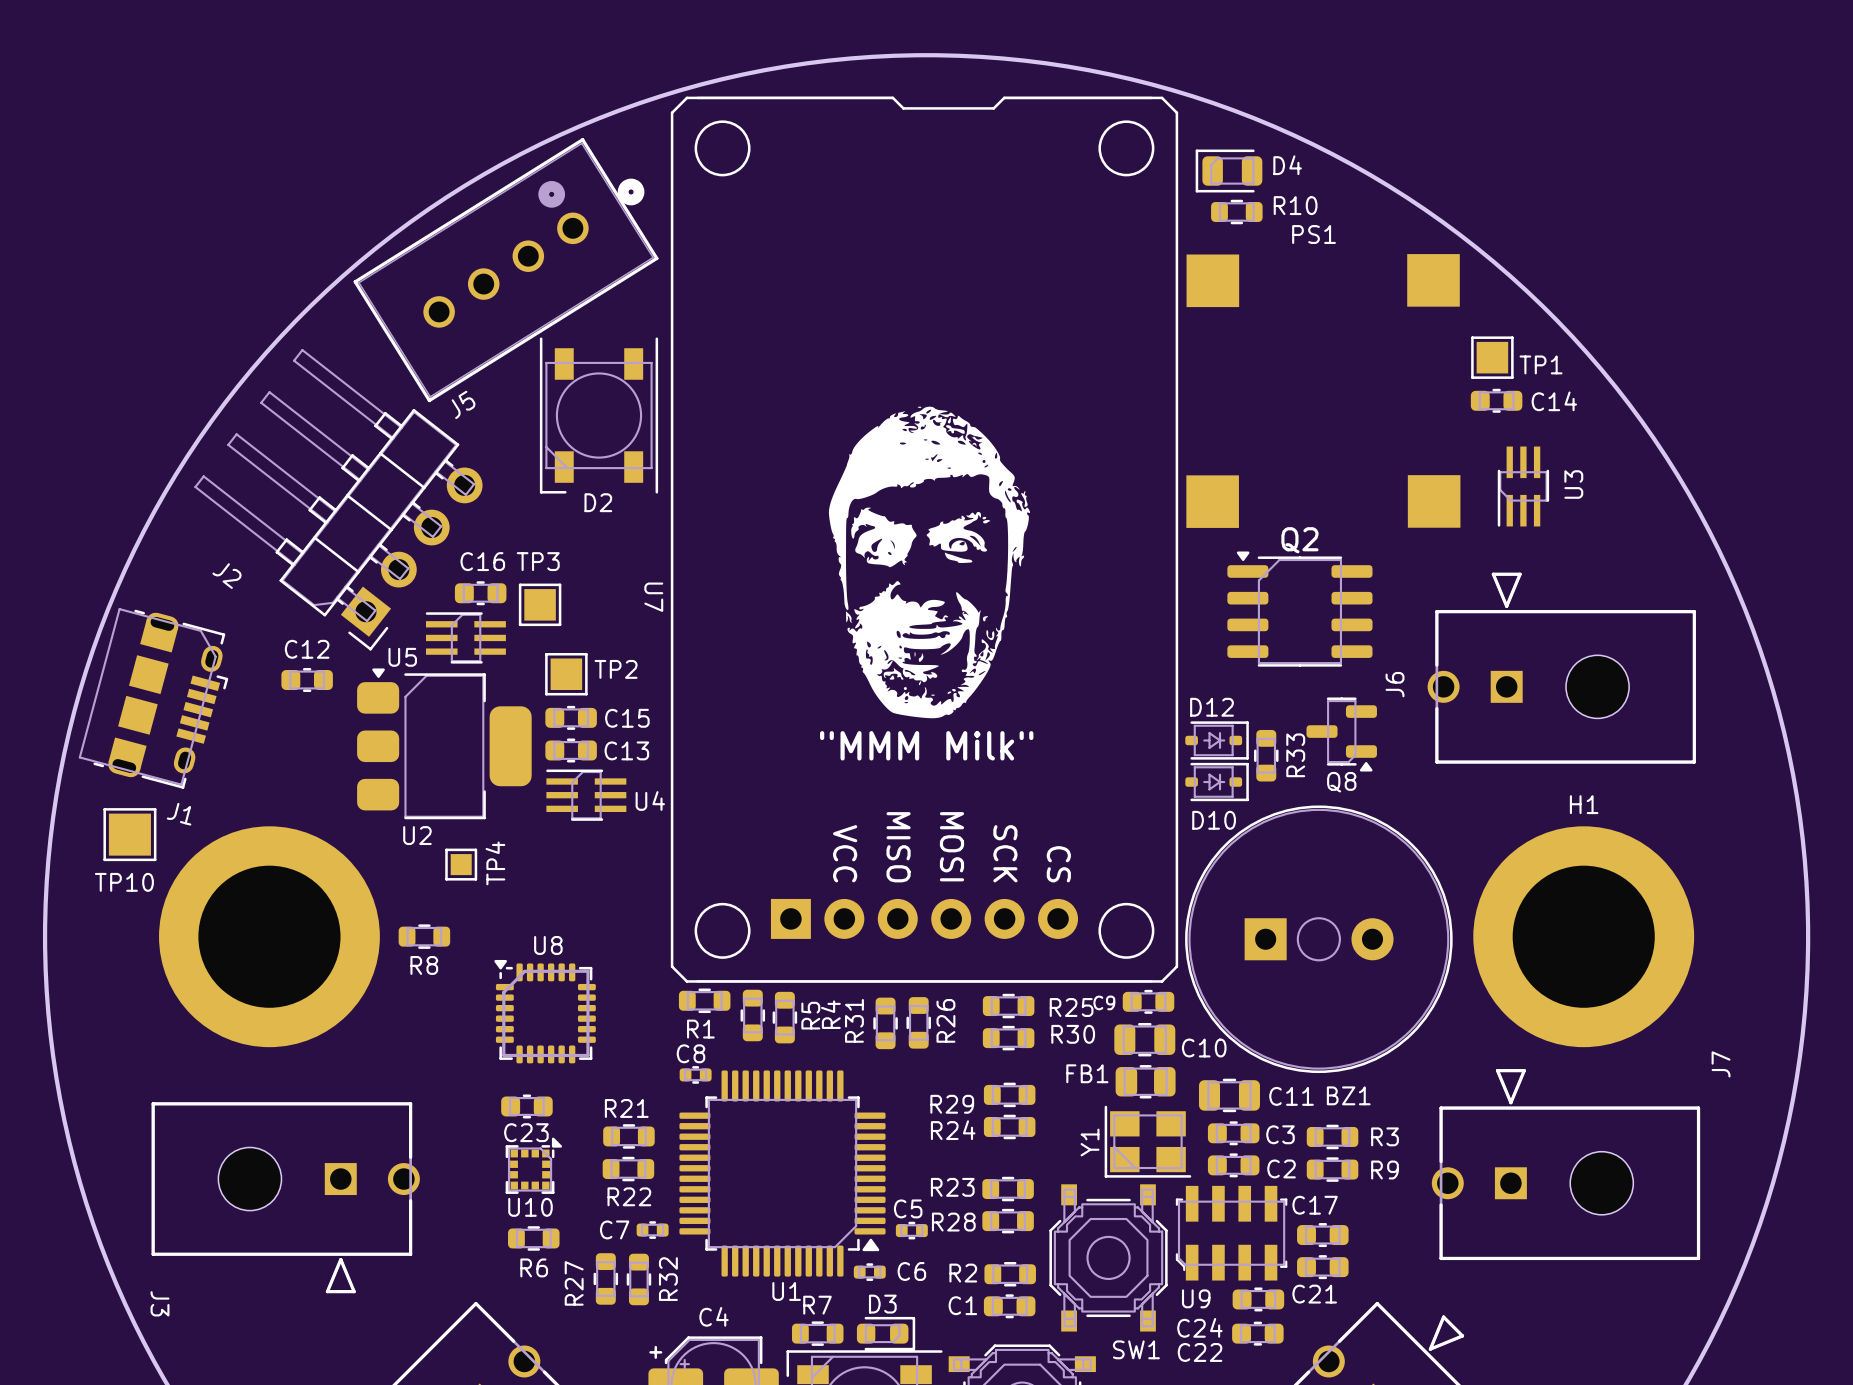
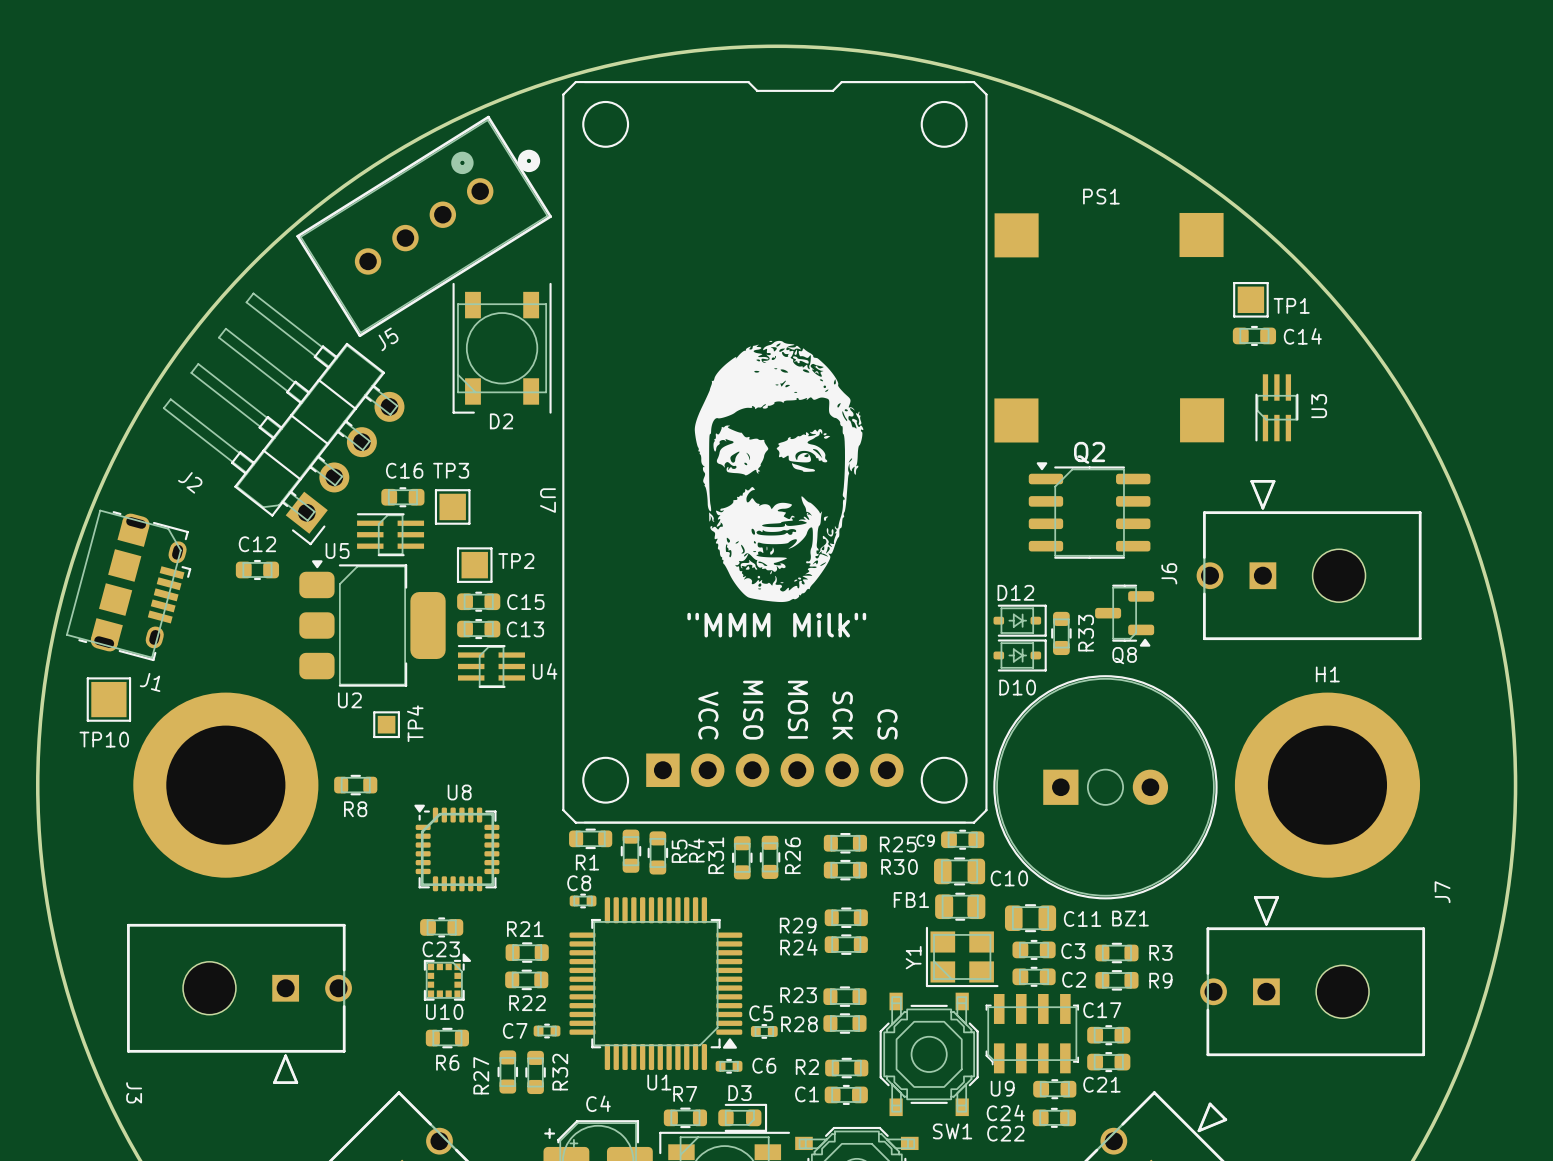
D4: (1229, 170) -> none
R10: (1236, 212) -> none

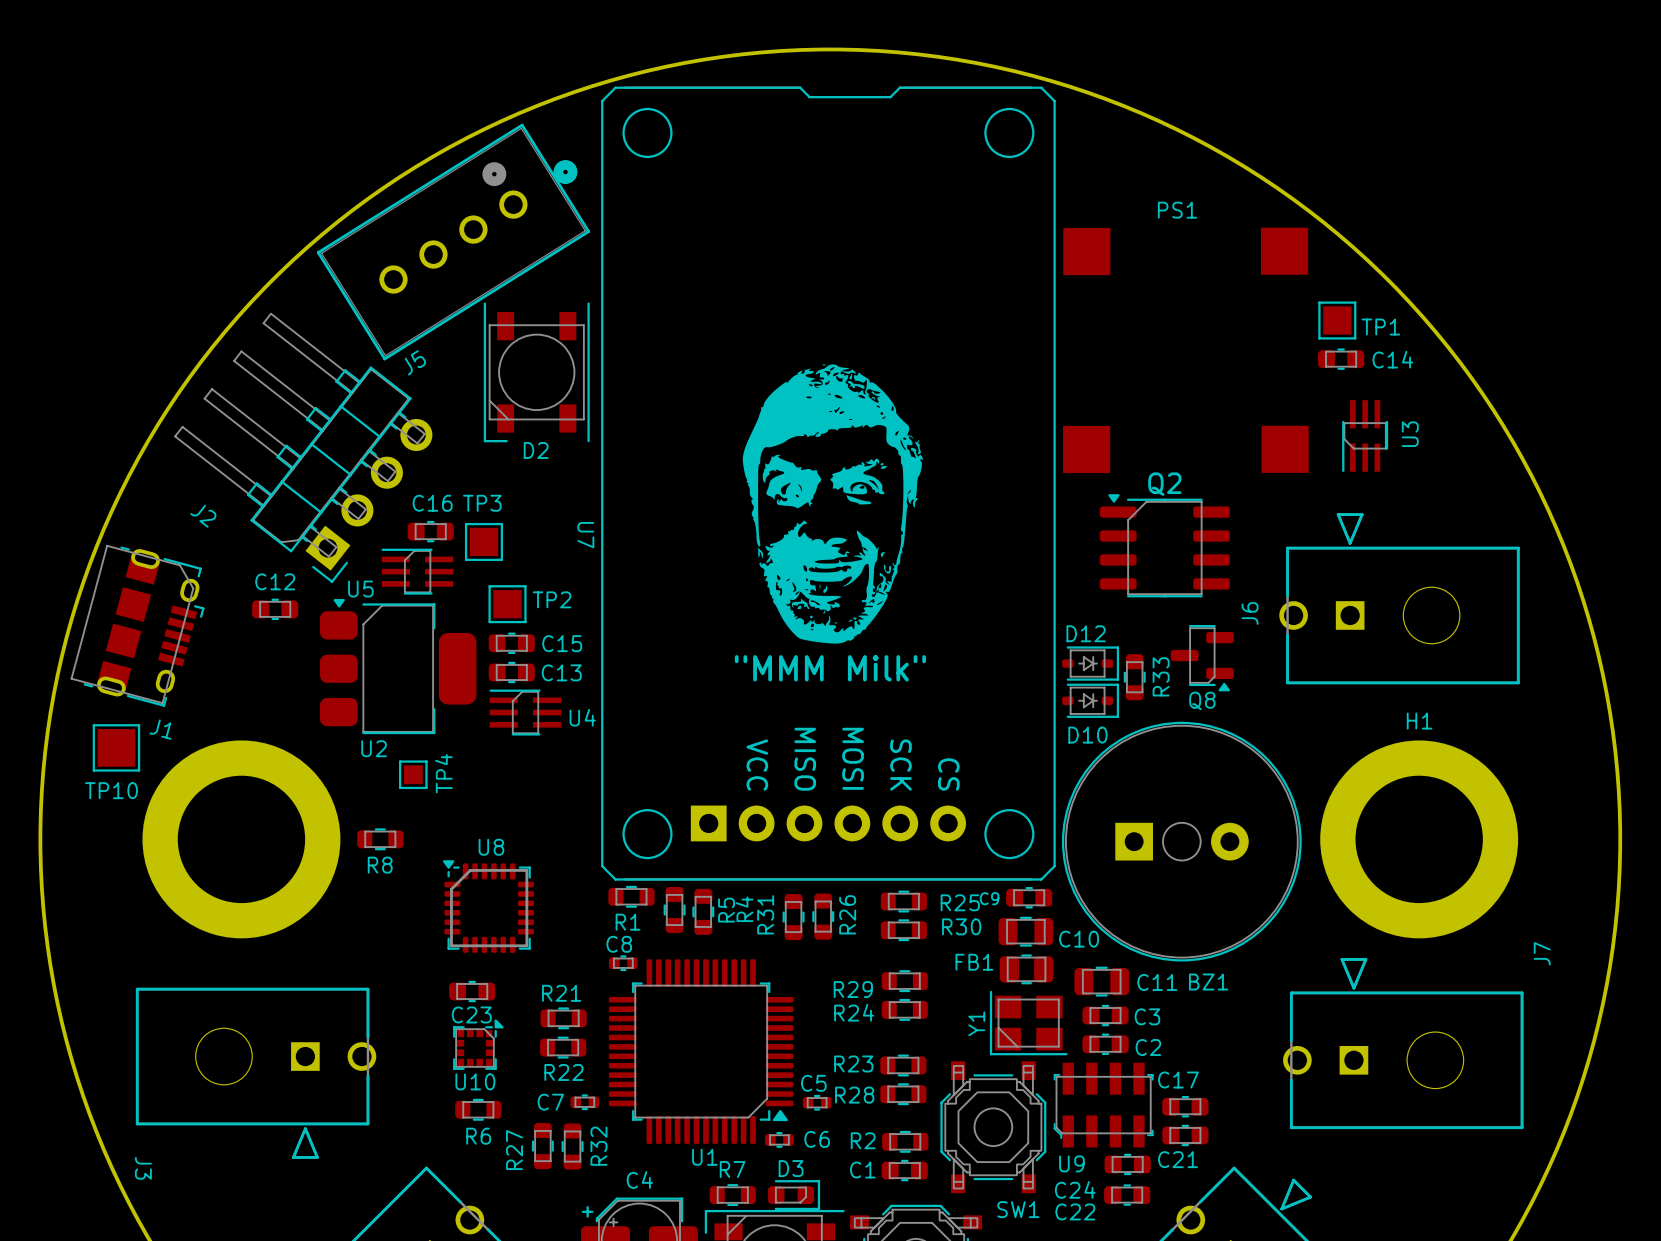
R3: (1116, 953) -> none
R9: (1116, 980) -> none

